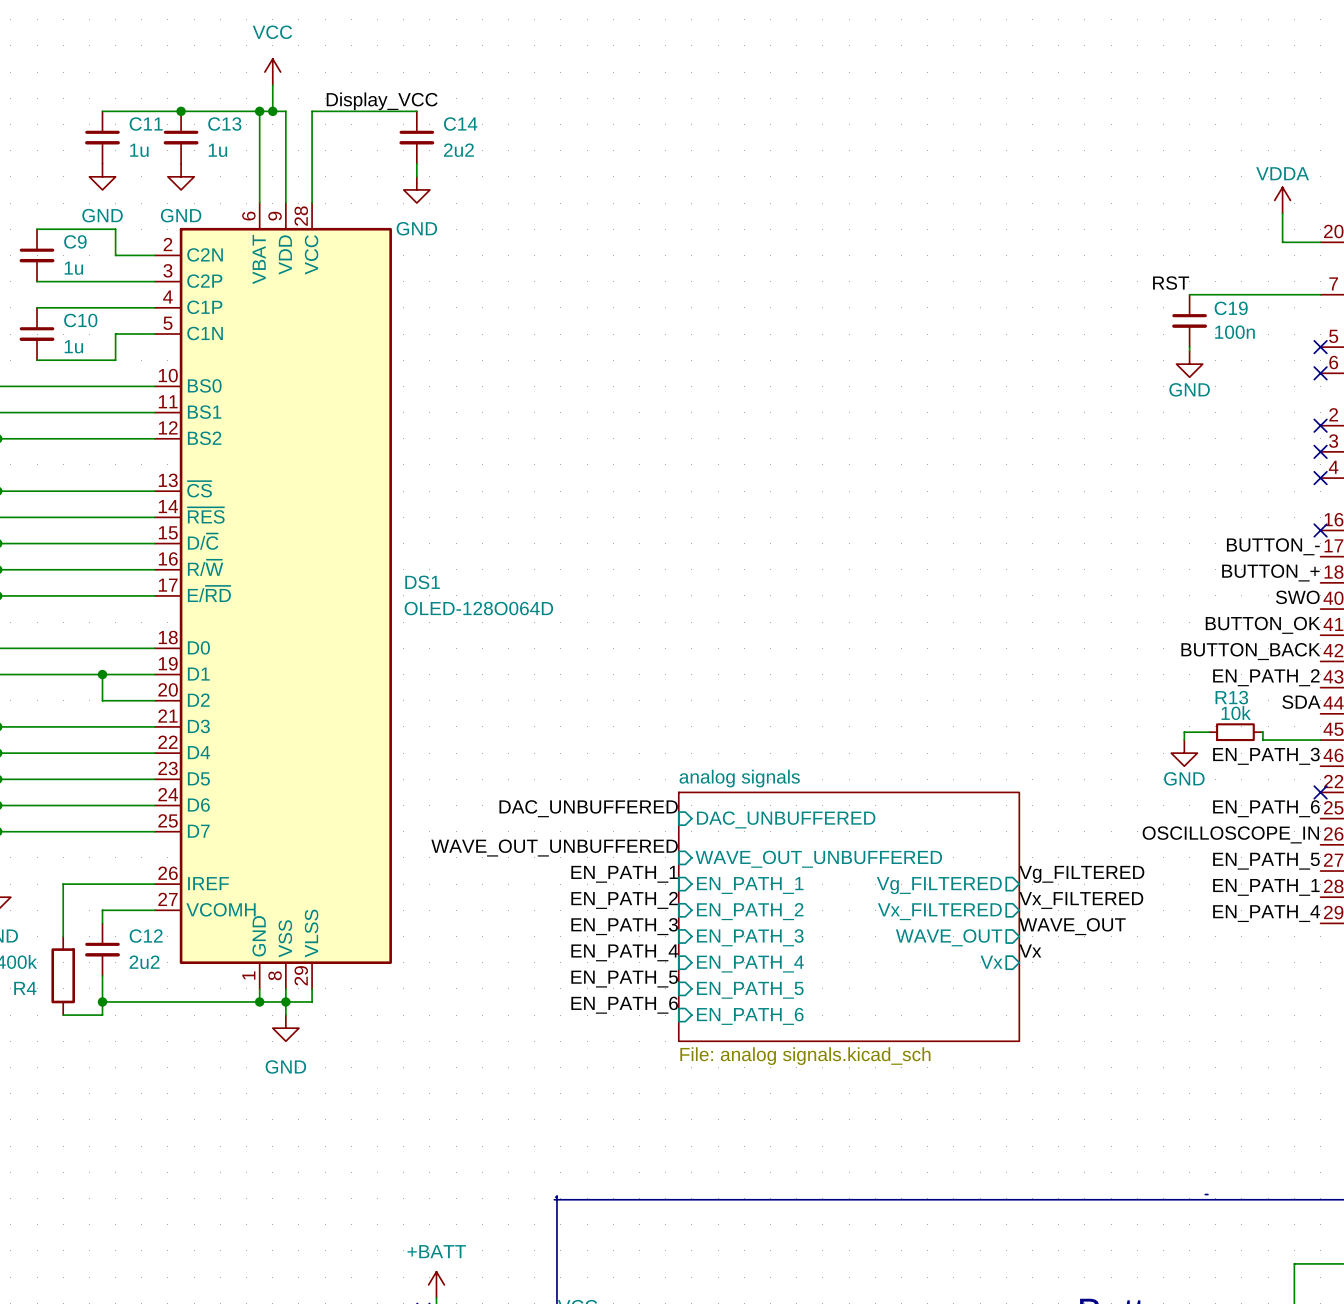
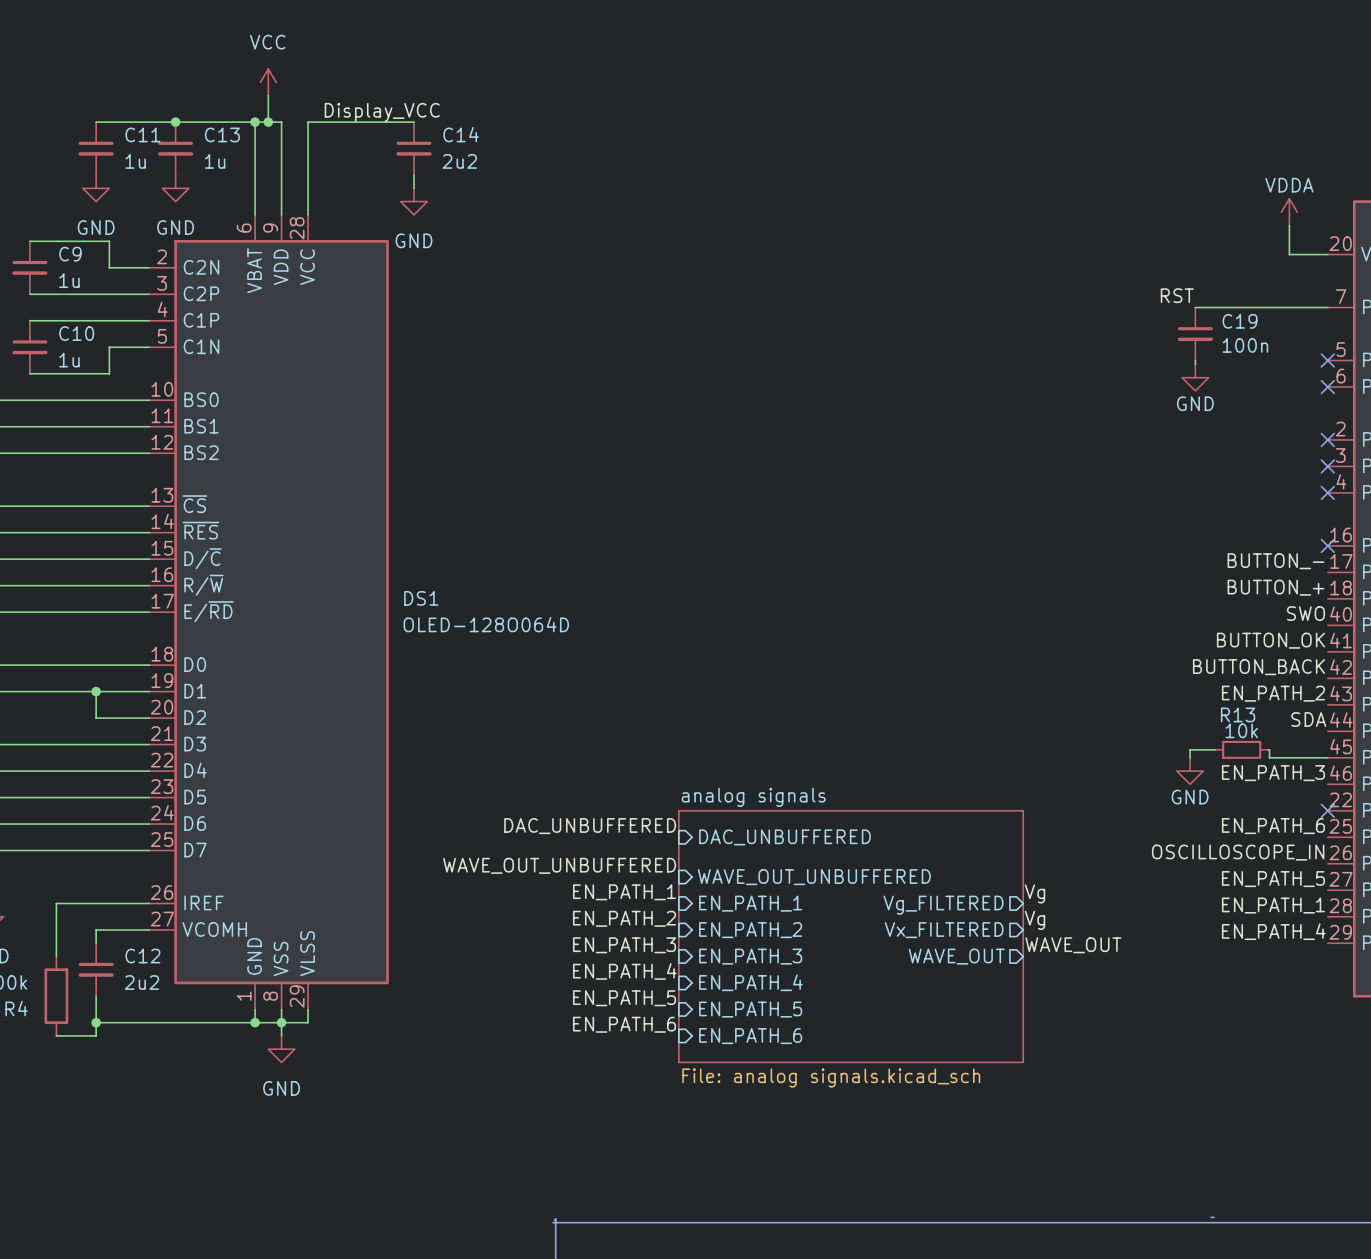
label: Vg_FILTERED (1081, 874) -> Vg (1034, 893)
label: Vx_FILTERED (1081, 900) -> Vg (1034, 920)
label: Vx (1030, 951) -> none
sheet pin: Vx (991, 962) -> none

